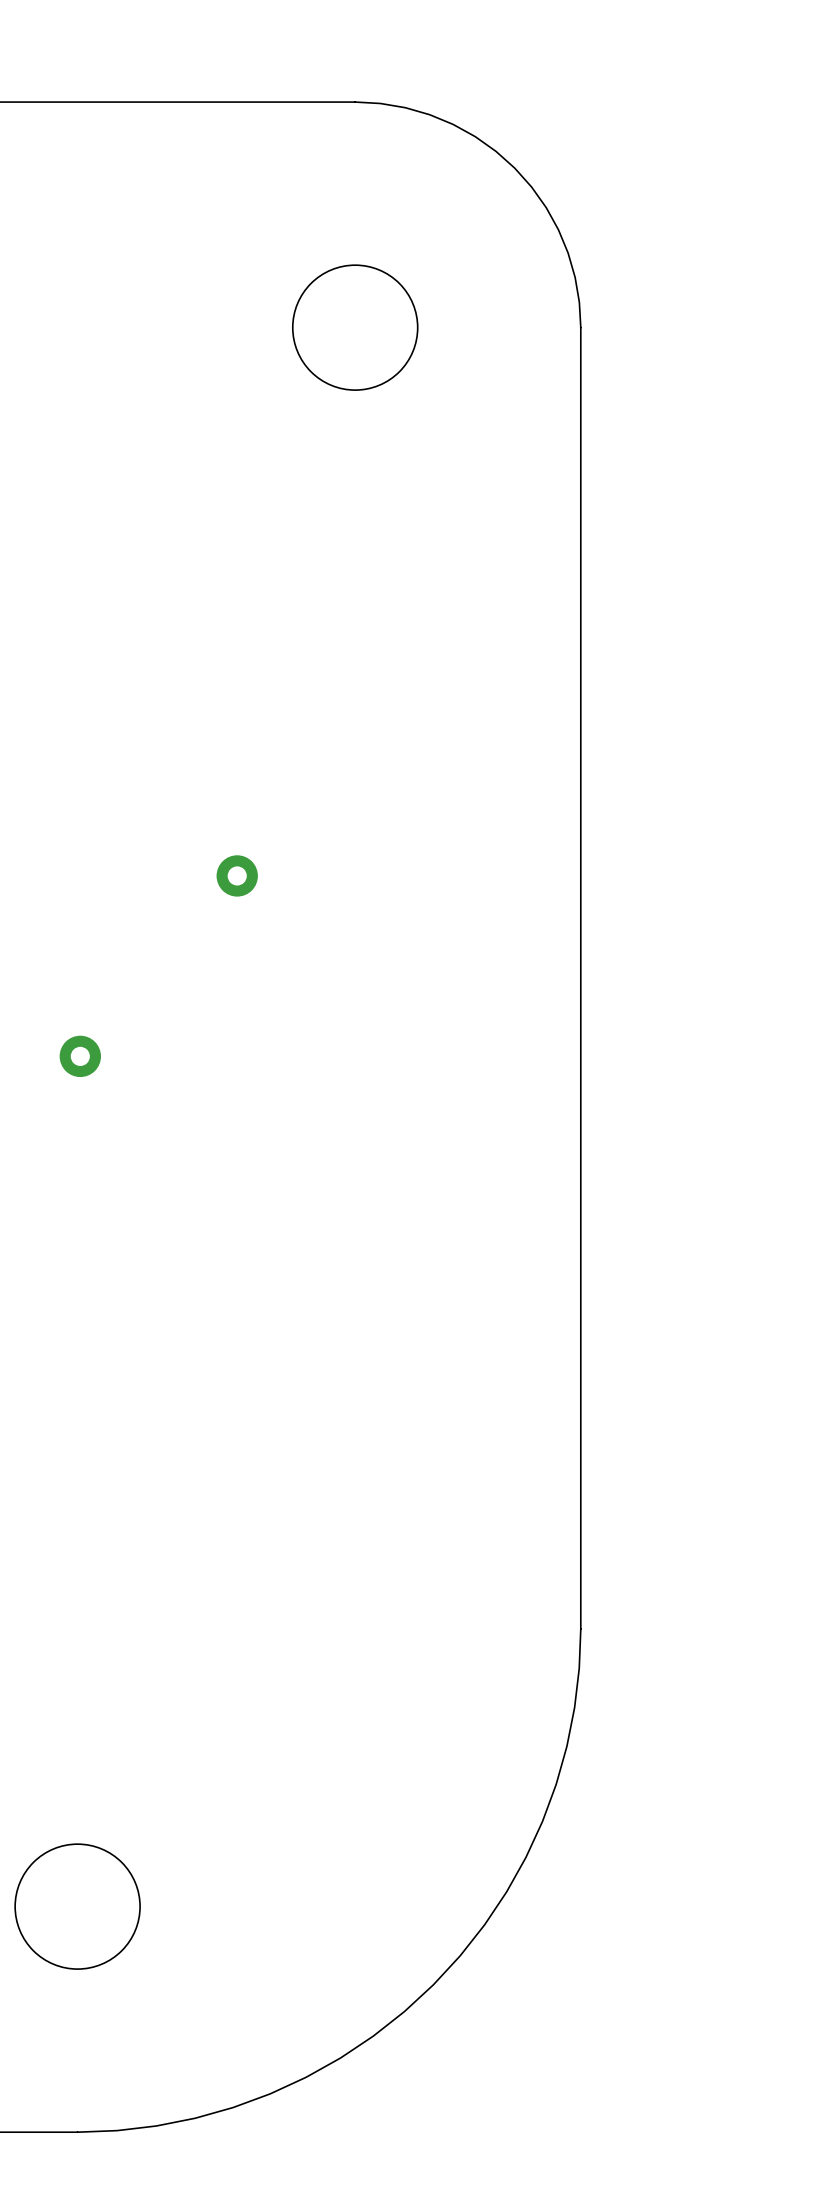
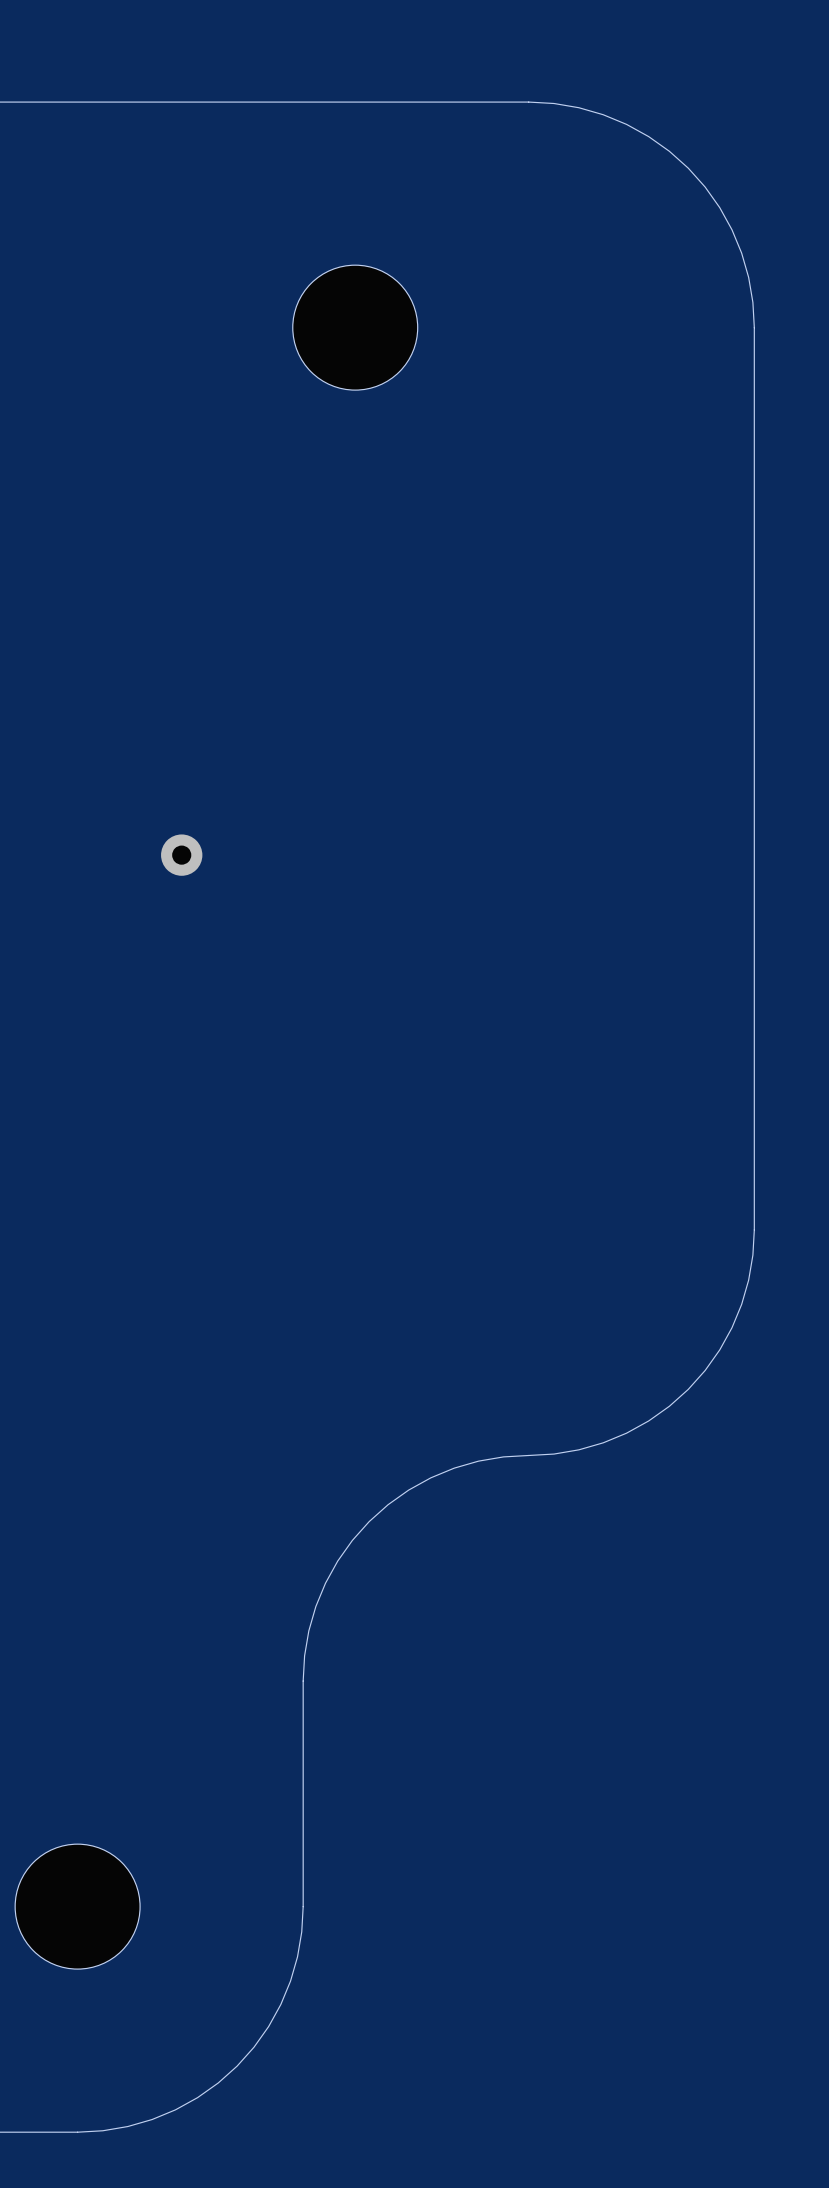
board edge: (355, 102) (405, 107) (429, 114) (475, 136) (514, 168) (546, 207) (558, 229) (568, 253) (579, 302) (580, 1629) (579, 1668) (574, 1707) (566, 1746) (556, 1784) (542, 1821) (525, 1857) (506, 1891) (484, 1924) (460, 1955) (433, 1984) (404, 2011) (373, 2036) (340, 2058) (306, 2077) (270, 2093) (233, 2107) (195, 2118) (156, 2125) (117, 2130) (77, 2132) -> (355, 102) (528, 102) (578, 107) (603, 114) (648, 136) (688, 168) (719, 207) (741, 253) (748, 277) (754, 327) (752, 1255) (741, 1304) (719, 1349) (688, 1389) (669, 1406) (648, 1420) (603, 1442) (554, 1454) (503, 1456) (478, 1461) (430, 1477) (388, 1504) (352, 1540) (337, 1561) (315, 1606) (304, 1655) (301, 1931) (290, 1981) (280, 2004) (253, 2047) (237, 2066) (197, 2097) (152, 2119) (127, 2126) (77, 2132)
via position: (237, 875) -> (181, 855)
via: (80, 1056) -> none

